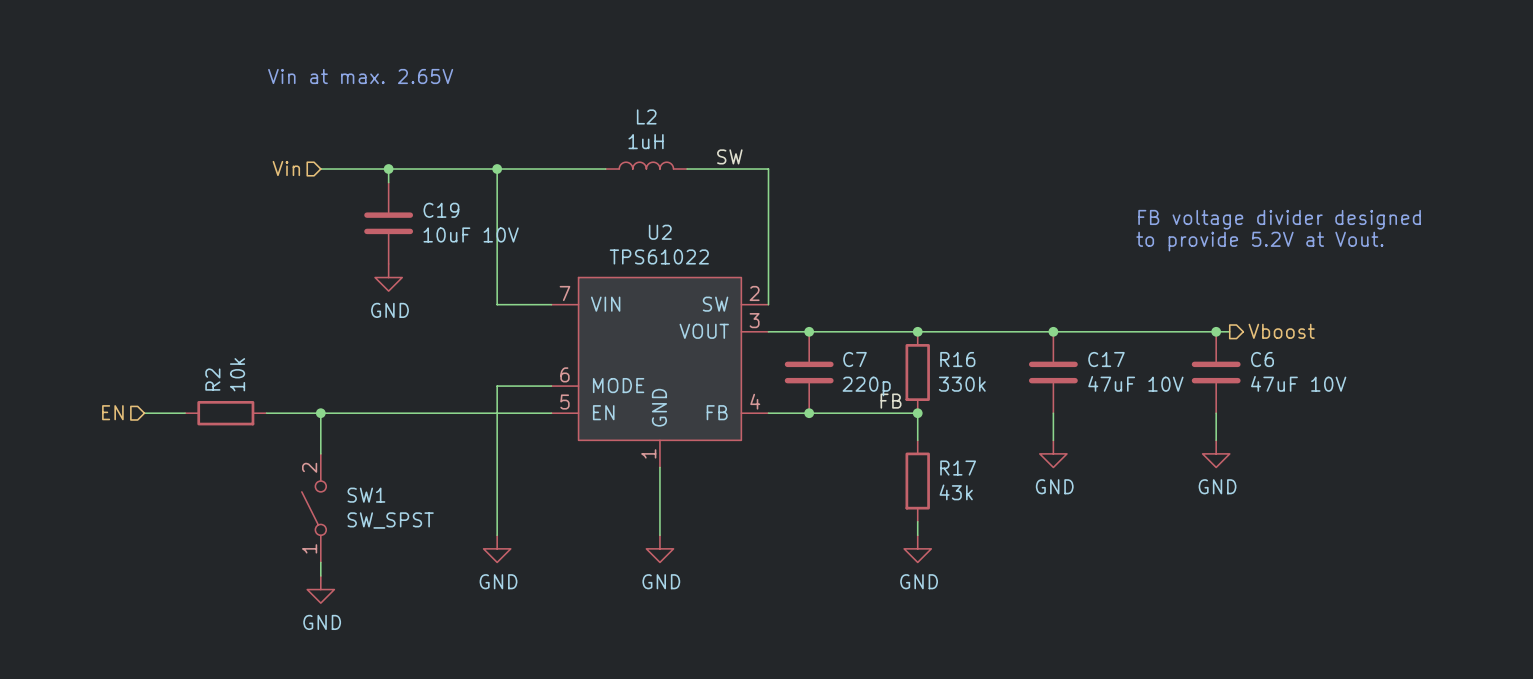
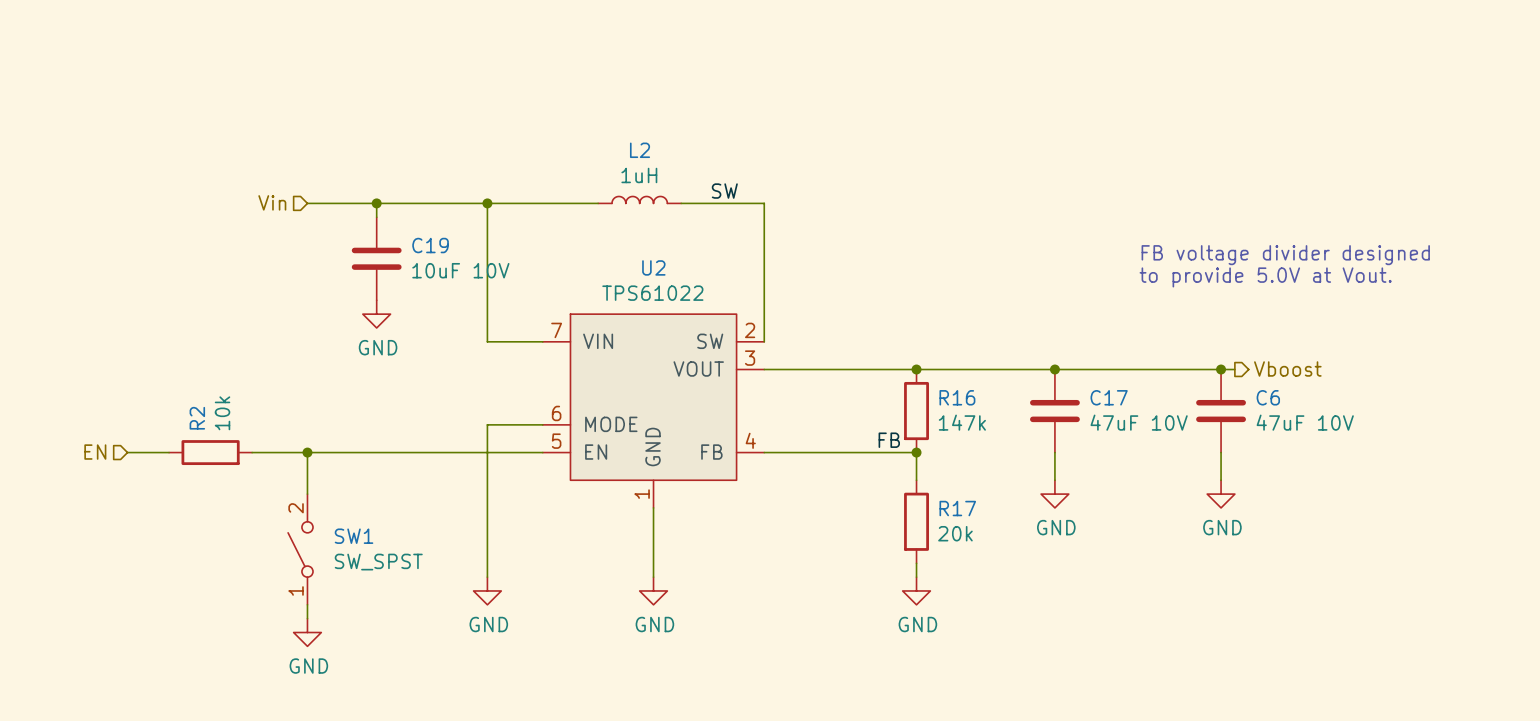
text: Vin at max. 2.65V (360, 76) -> none
text: to provide 5.2V at Vout. (1259, 241) -> to provide 5.0V at Vout. (1265, 277)
junction: (809, 331) -> none
C7: 220p (809, 372) -> none
R16 value: 330k (962, 384) -> 147k (962, 422)
junction: (809, 413) -> none
R17 value: 43k (956, 492) -> 20k (955, 533)

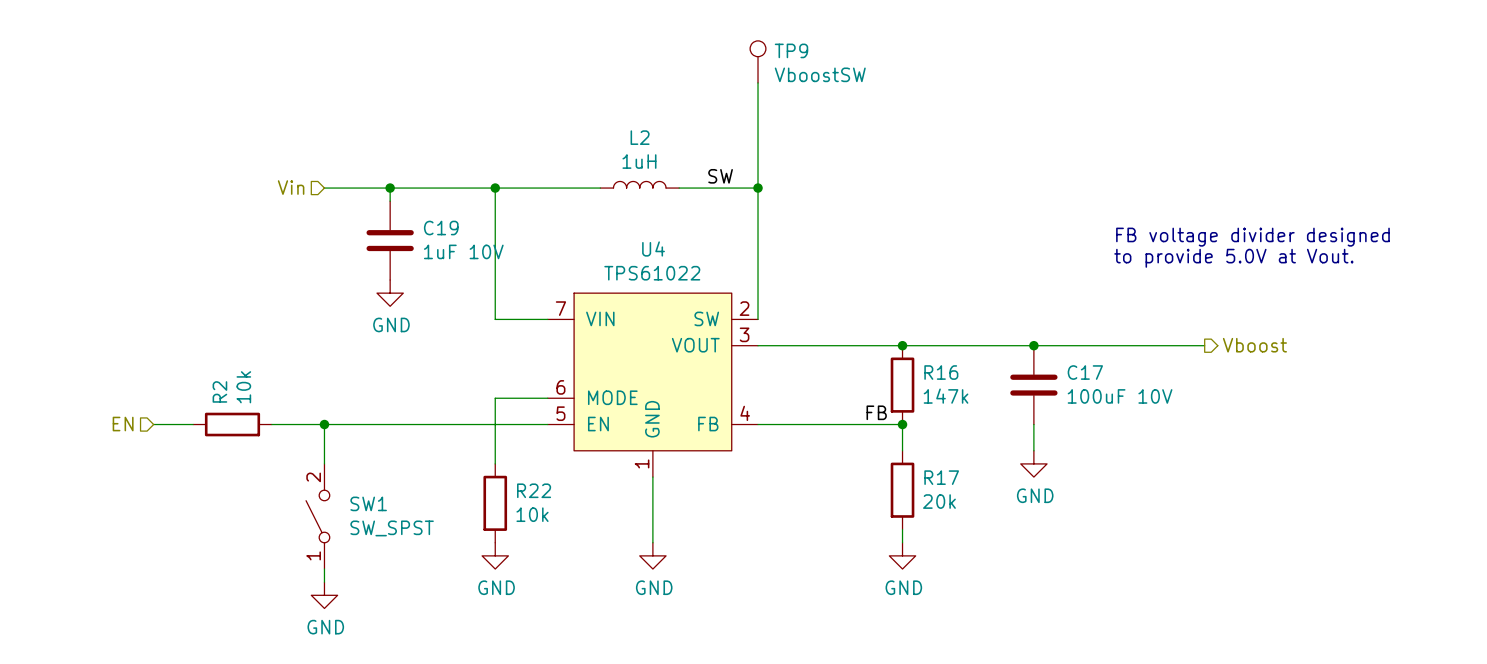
TP9: none -> VboostSW (758, 61)
wire: none -> (758, 82) (758, 188)
junction: none -> (758, 188)
U2 name: U2 (653, 267) -> U4 (653, 248)
C19 value: 10uF 10V (460, 270) -> 1uF 10V (463, 251)
junction: (1221, 369) -> none
C6: 47uF 10V (1221, 411) -> none
C17 value: 47uF 10V (1139, 422) -> 100uF 10V (1120, 396)
wire: (1221, 452) (1221, 480) -> none
wire: (487, 494) (487, 577) -> none
power symbol: GND (1221, 494) -> none
R22: none -> 10k (495, 503)

